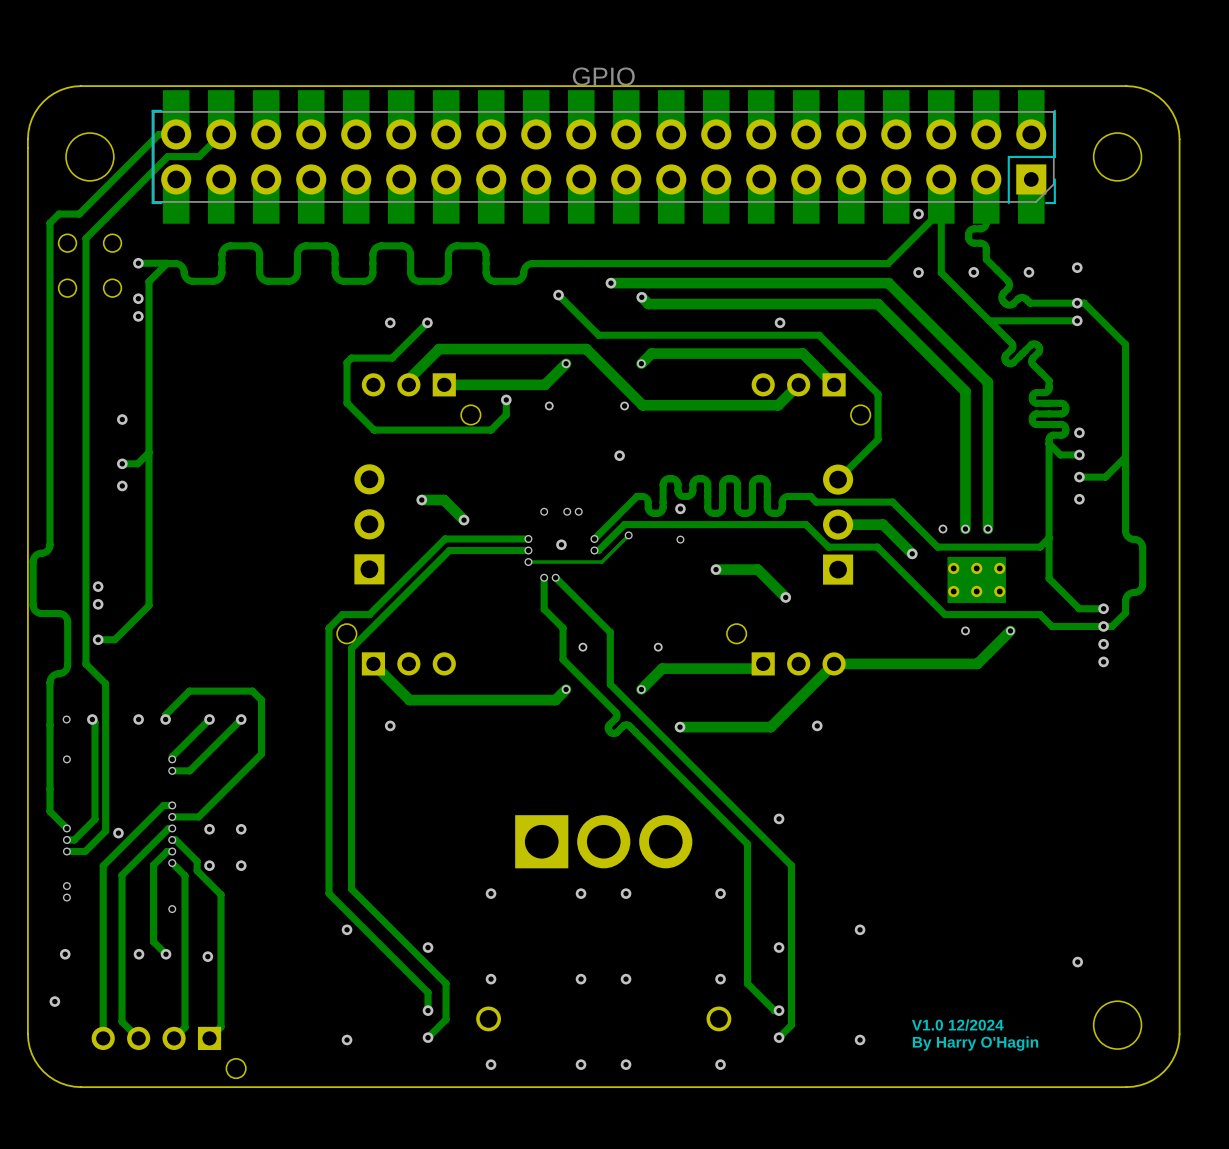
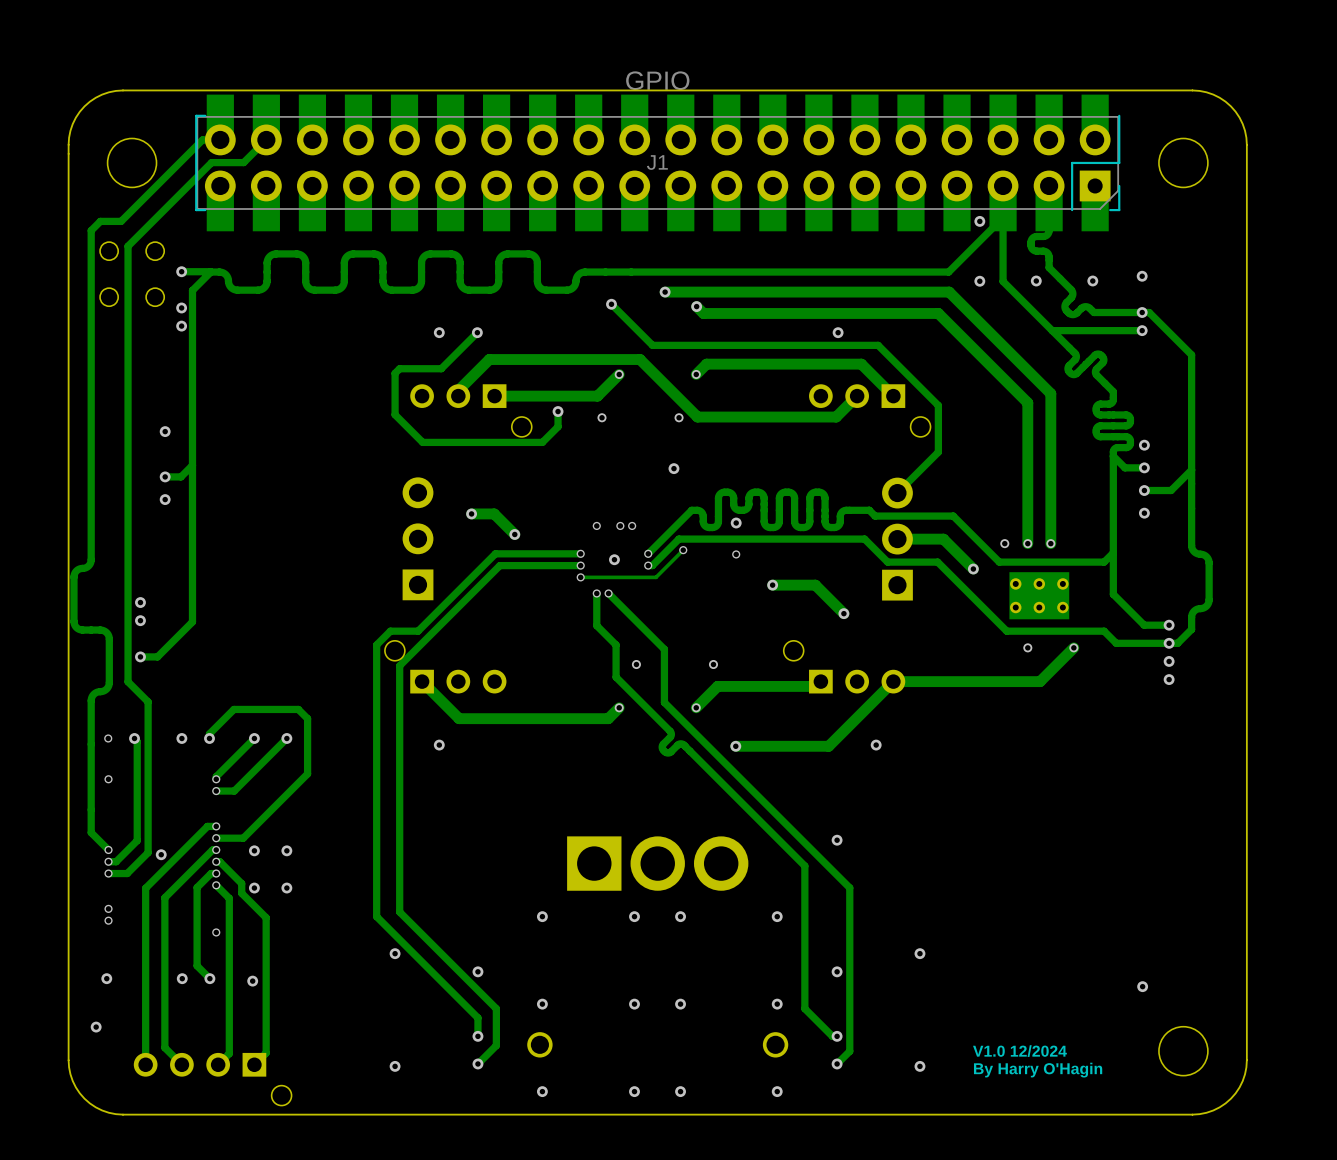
J1 name: none -> J1 (657, 162)

